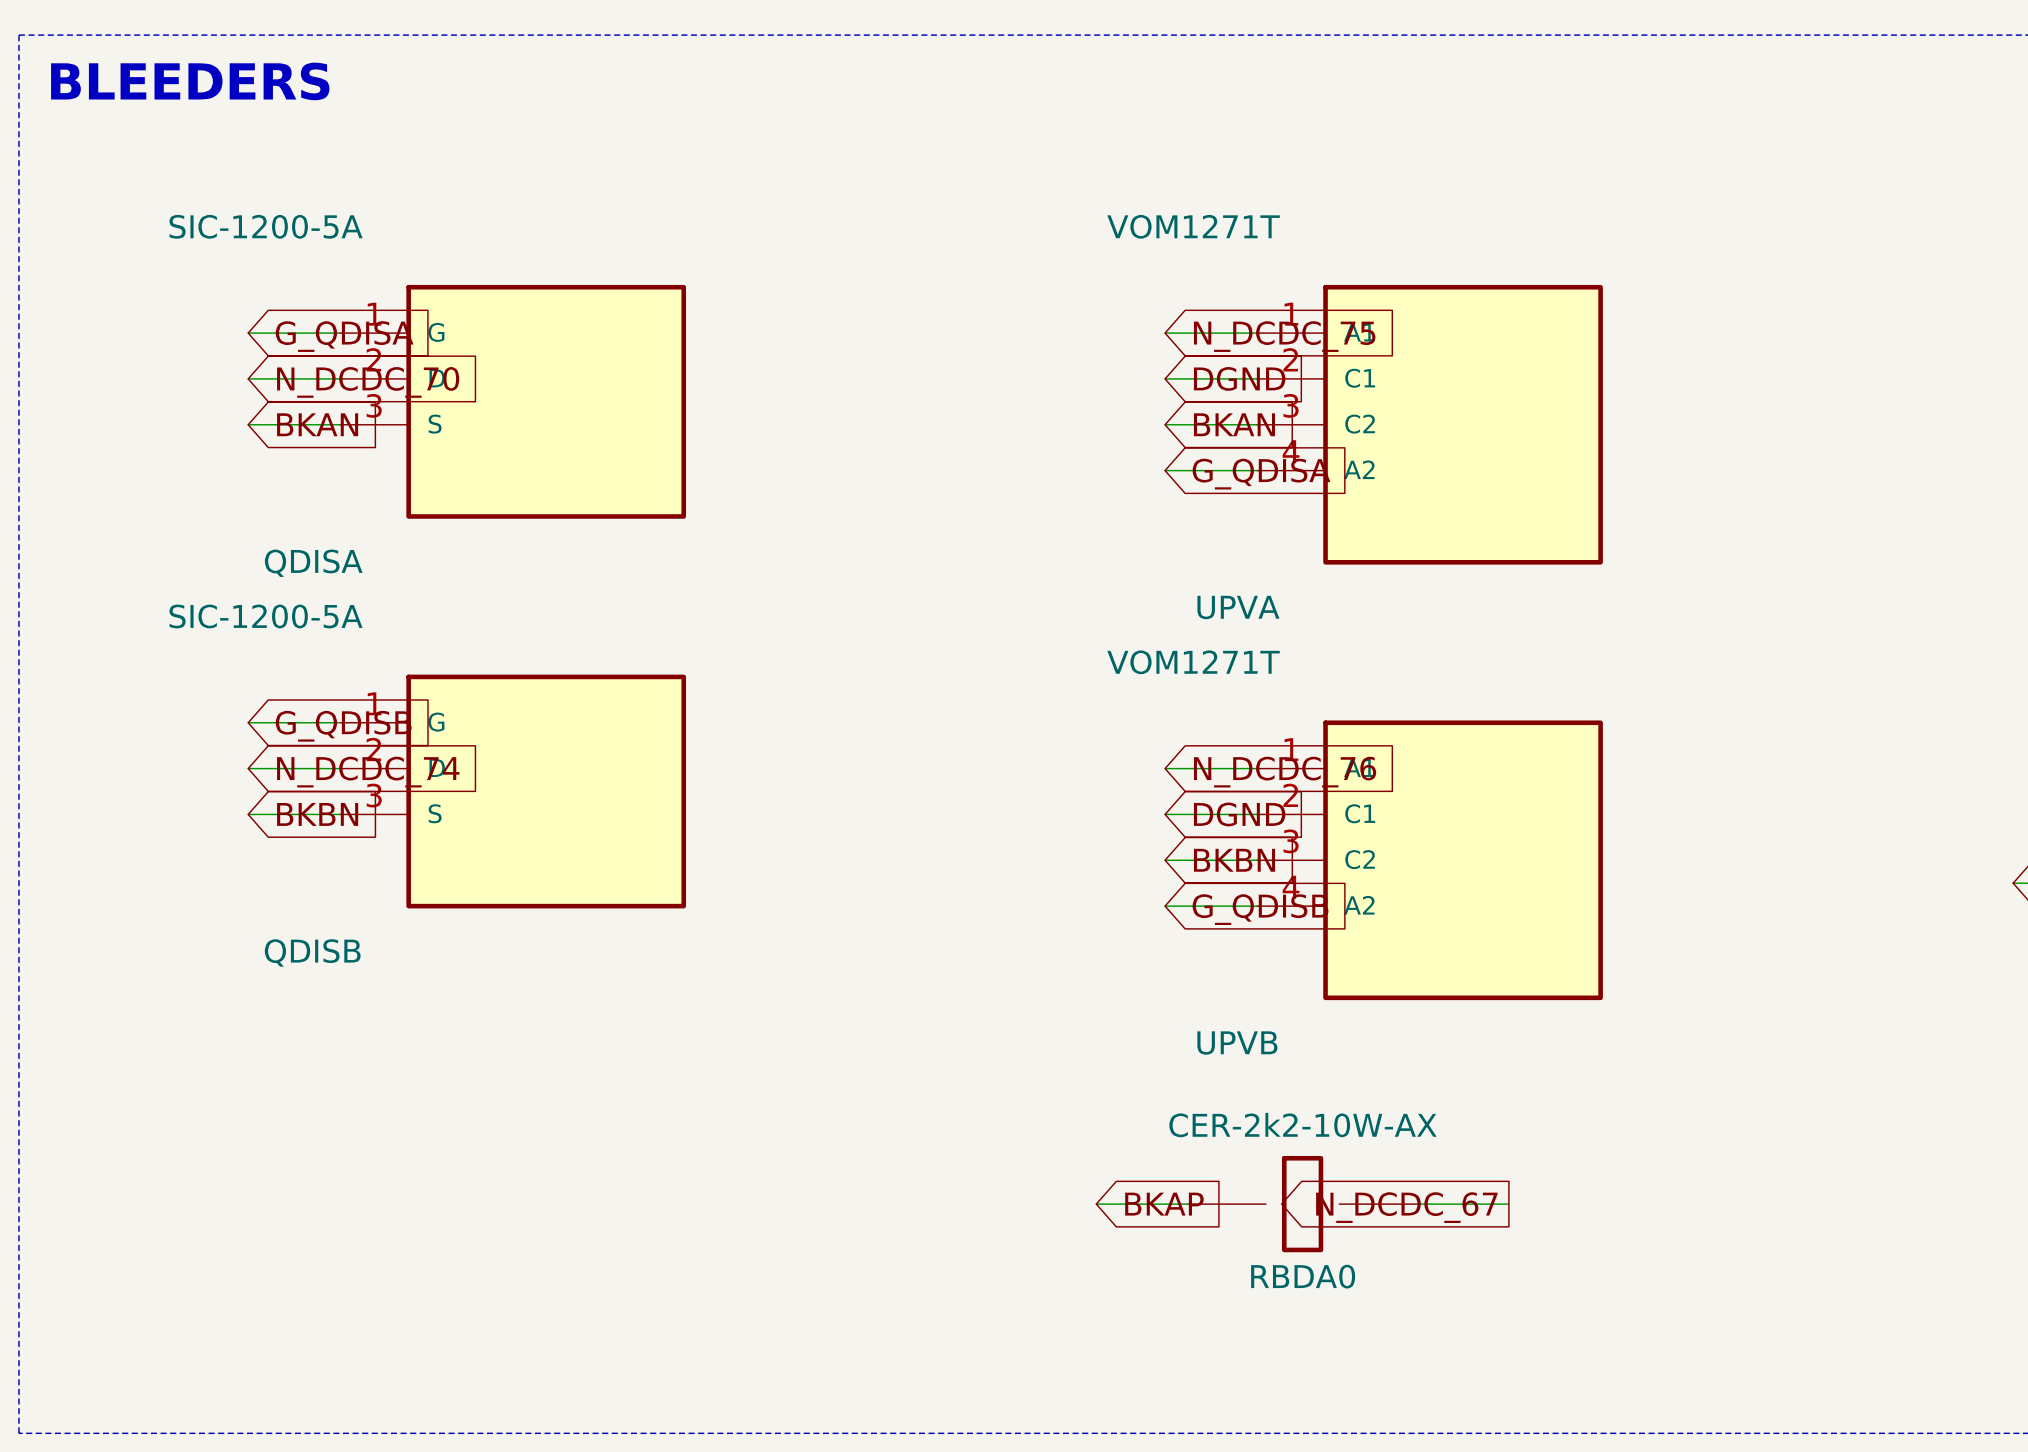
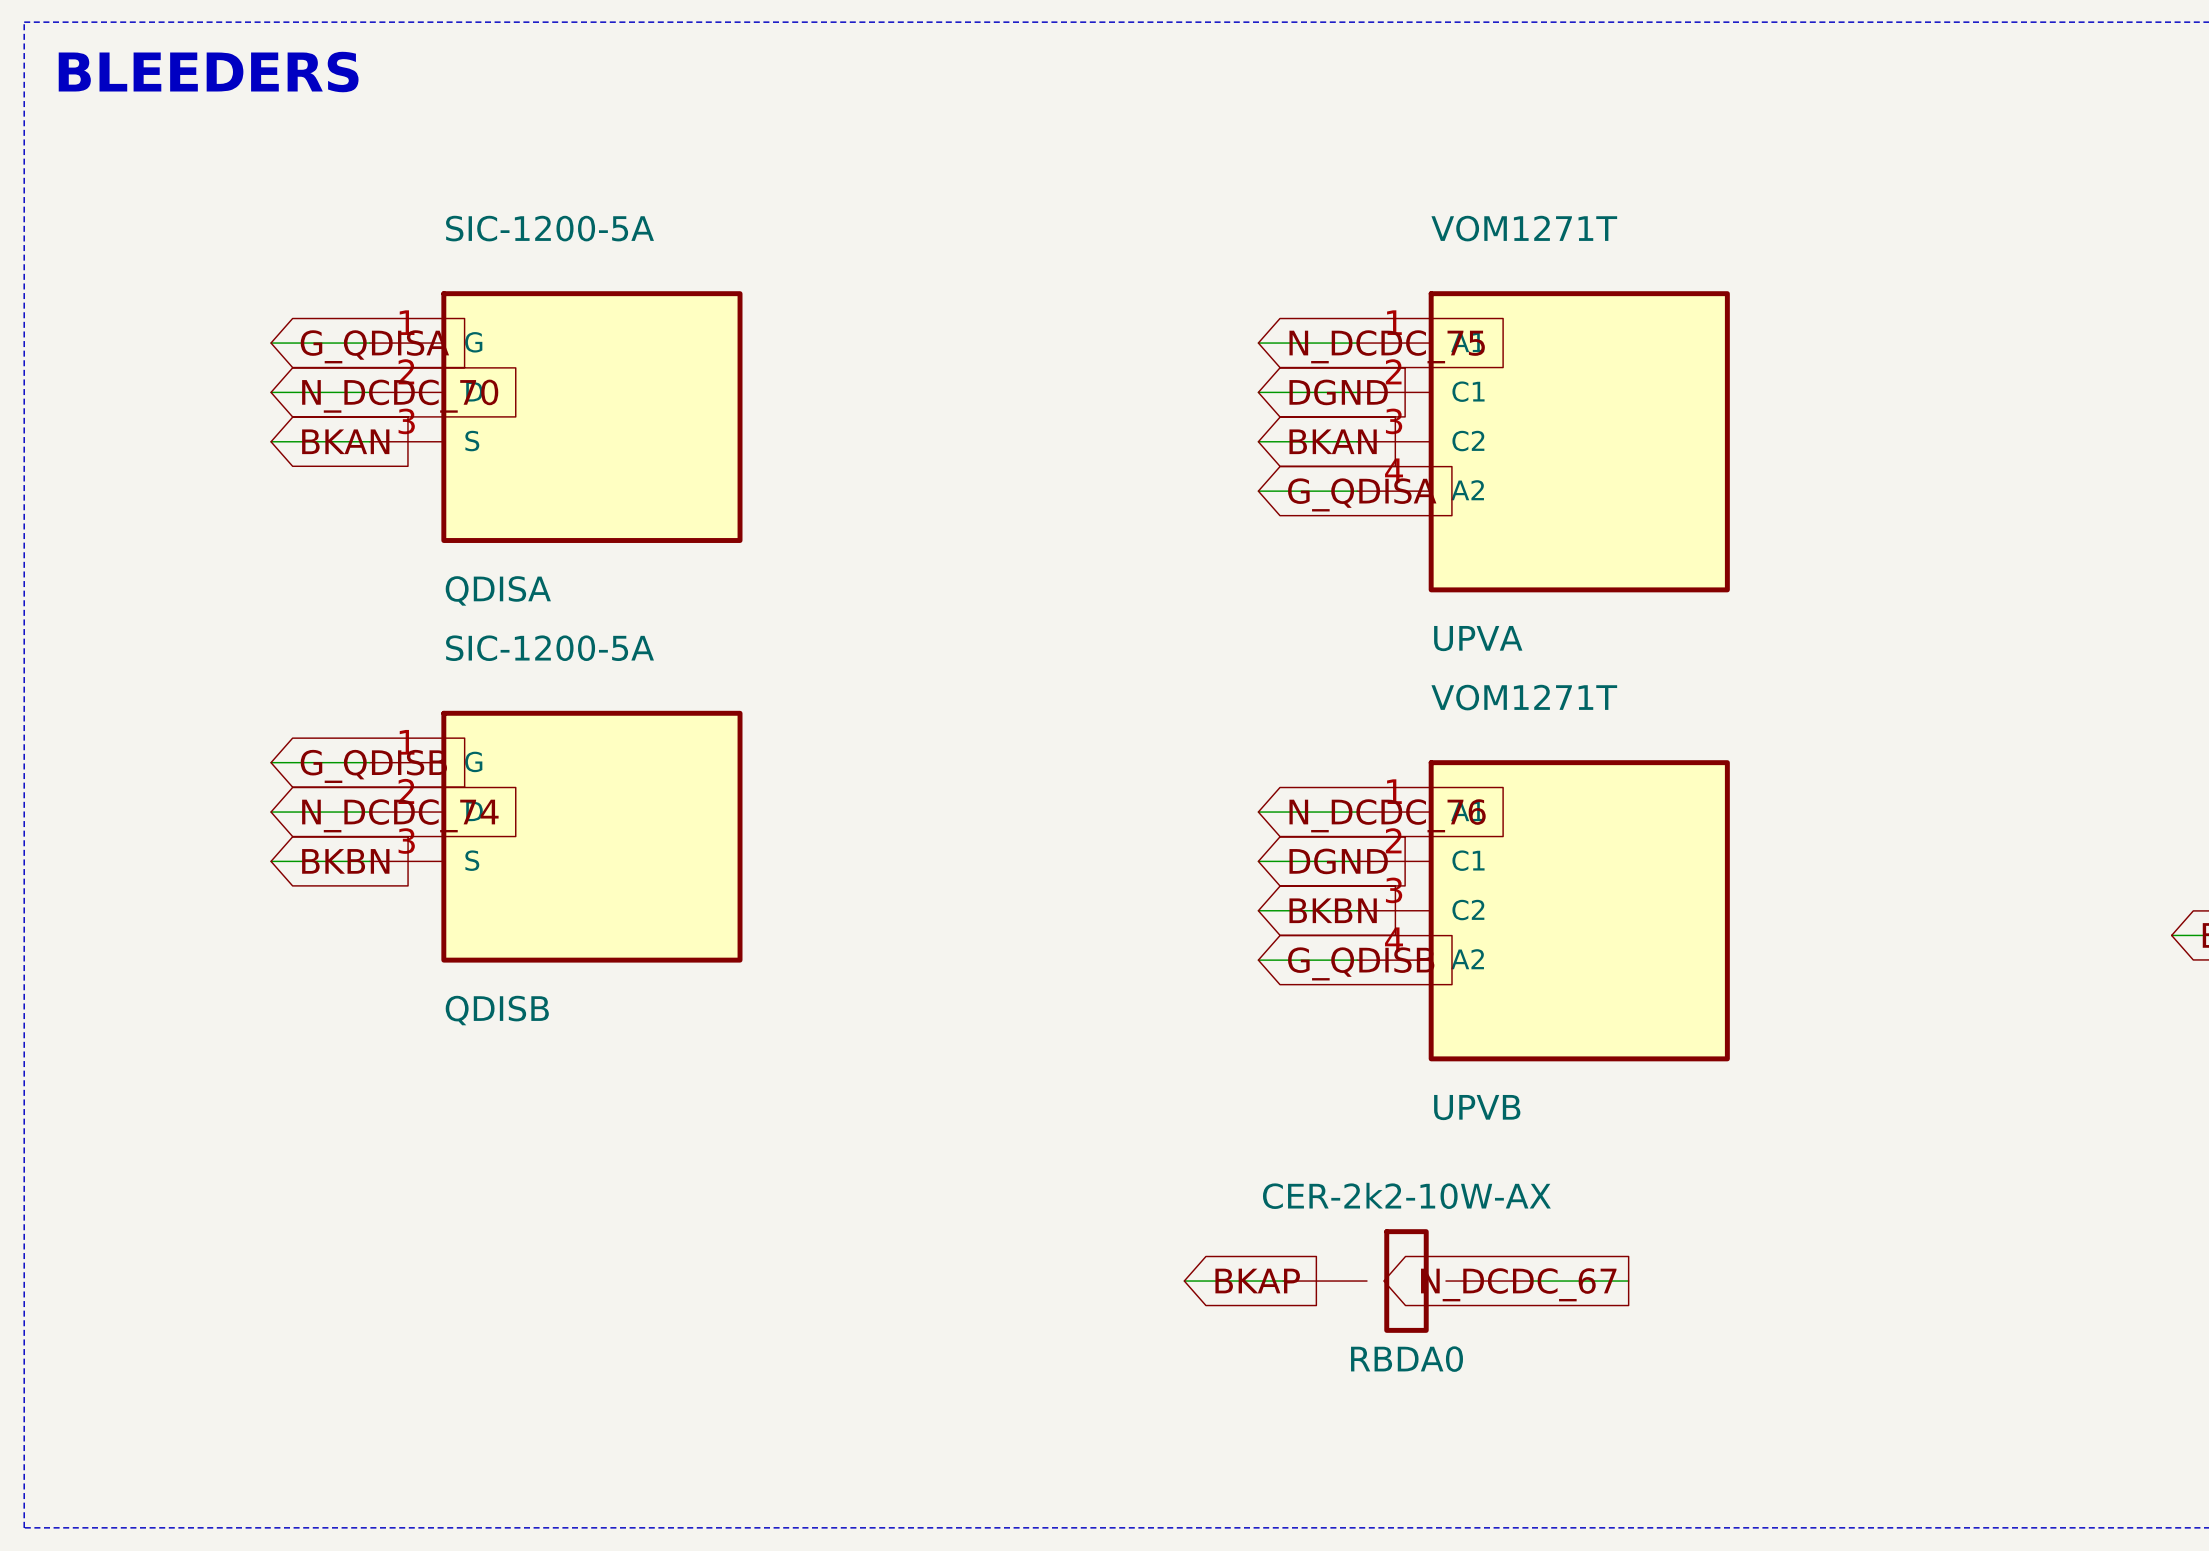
QDISA value position: SIC-1200-5A (266, 226) -> SIC-1200-5A (550, 228)
UPVA value position: VOM1271T (1193, 226) -> VOM1271T (1524, 228)
QDISA name position: QDISA (313, 563) -> QDISA (498, 590)
UPVA name position: UPVA (1238, 607) -> UPVA (1478, 638)
QDISB value position: SIC-1200-5A (266, 616) -> SIC-1200-5A (550, 648)
UPVB value position: VOM1271T (1193, 662) -> VOM1271T (1524, 697)
QDISB name position: QDISB (312, 952) -> QDISB (497, 1010)
UPVB name position: UPVB (1237, 1043) -> UPVB (1477, 1107)

